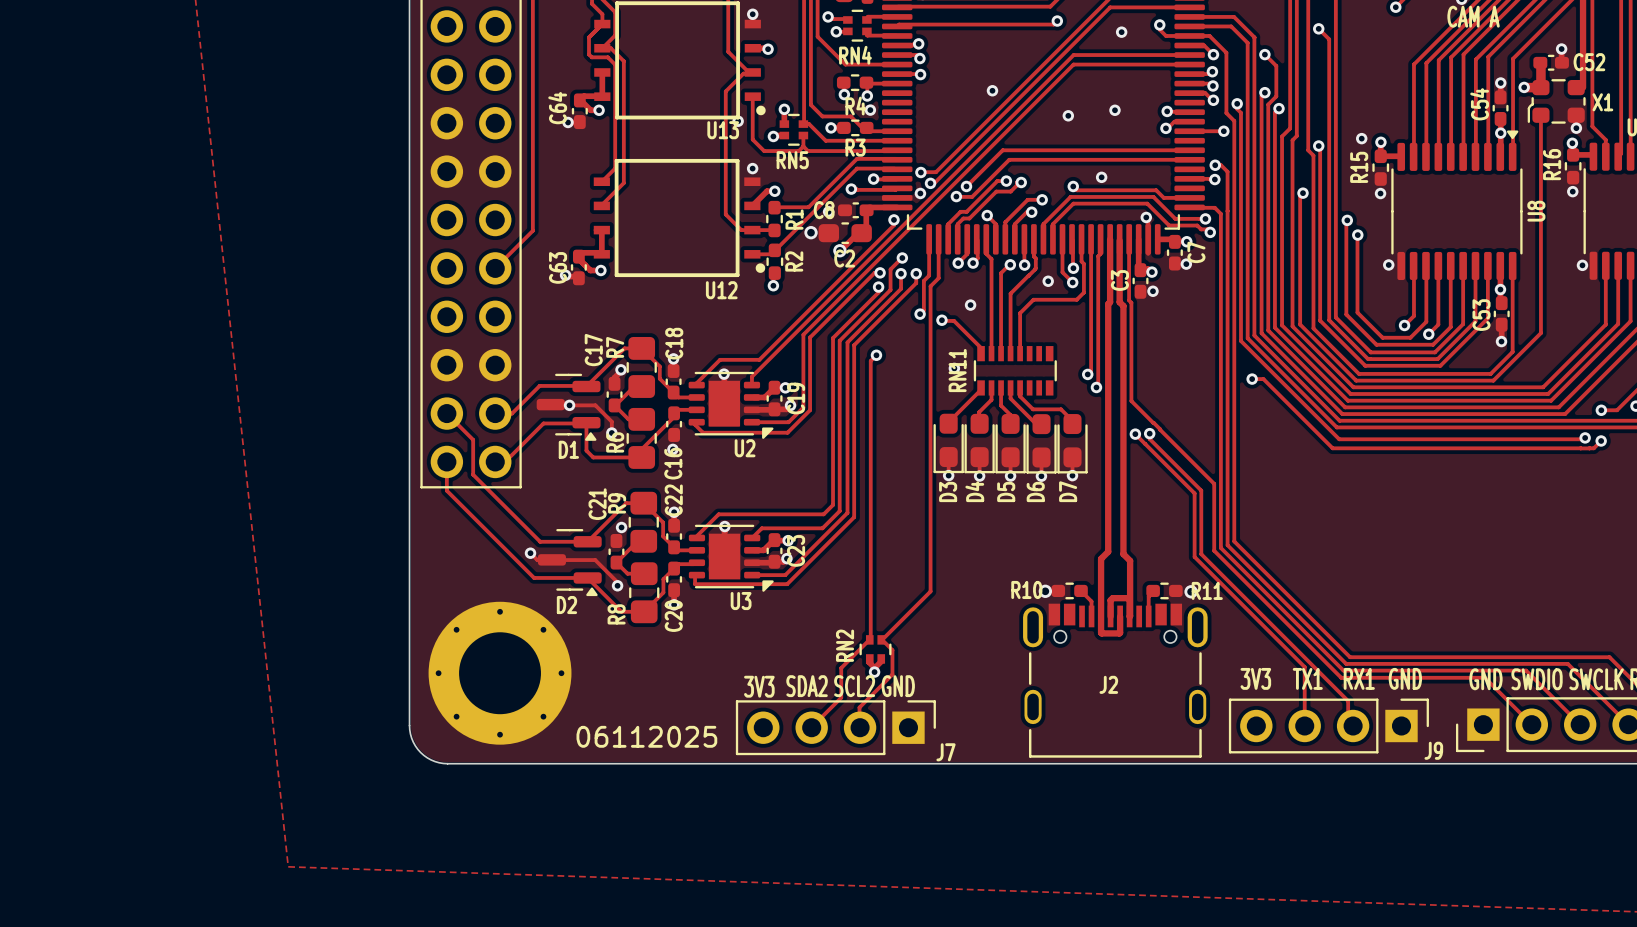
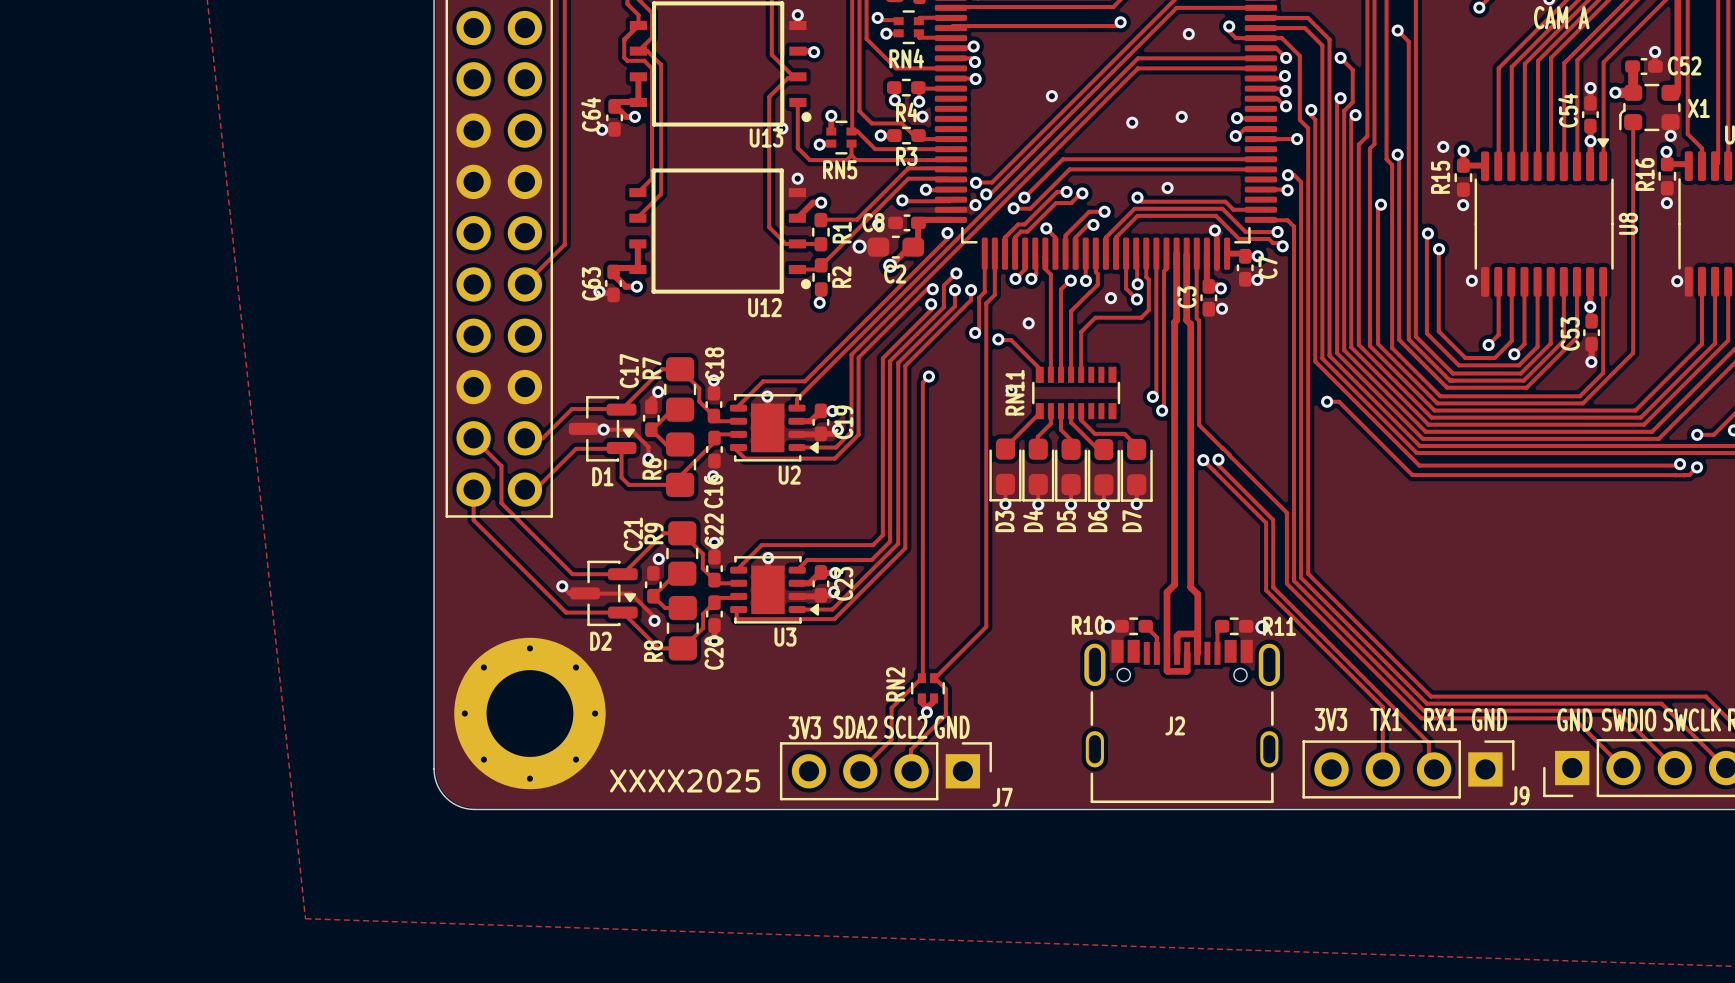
U2 footprint: [688, 371, 774, 439] -> [729, 394, 819, 462]
D1 footprint: [536, 373, 601, 441] -> [568, 396, 637, 462]
U3 footprint: [688, 524, 774, 592] -> [730, 556, 820, 624]
D2 footprint: [537, 529, 602, 597] -> [570, 560, 638, 627]
text: 06112025 (646, 736) -> XXXX2025 (685, 780)

